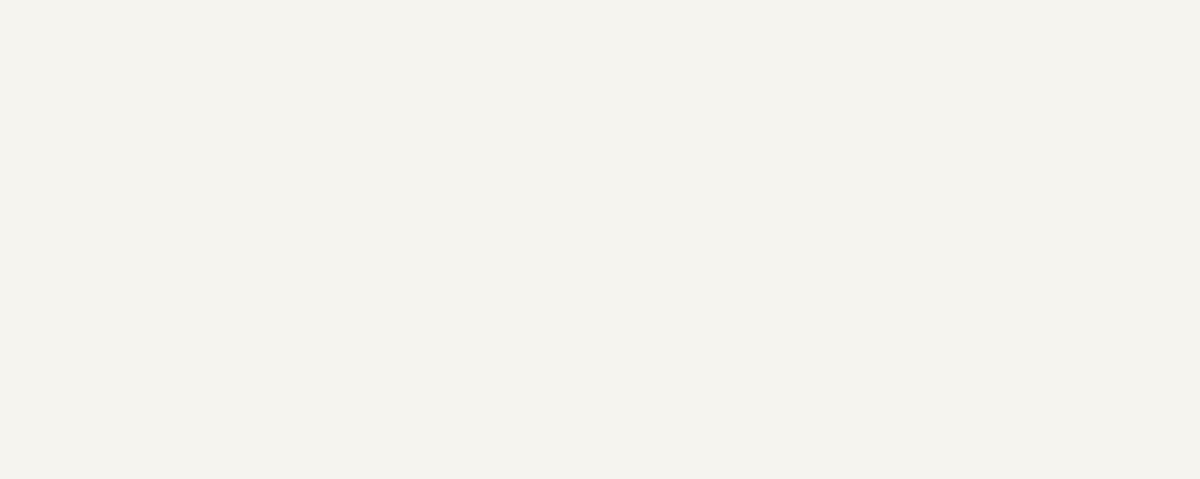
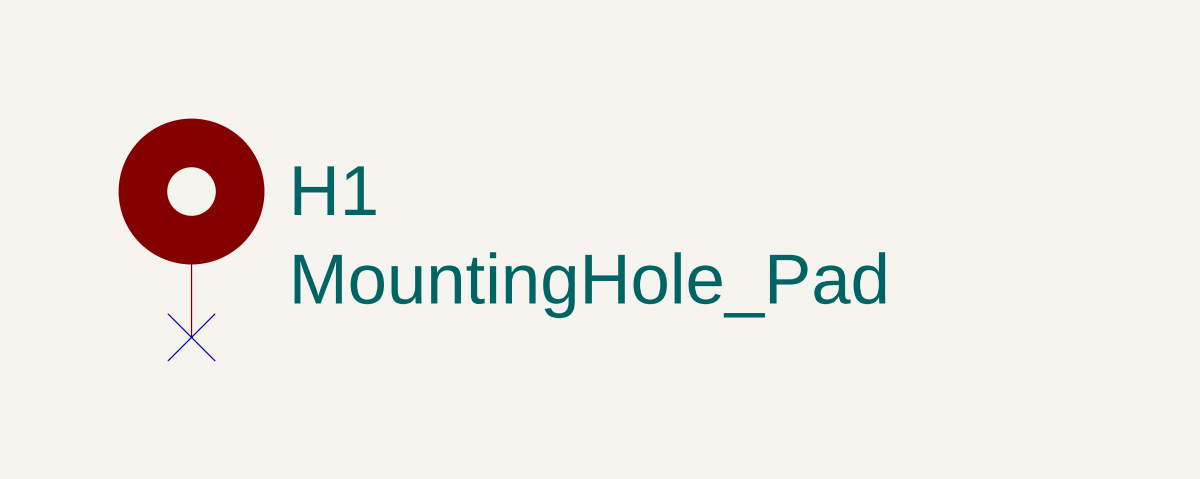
H1: none -> MountingHole_Pad (191, 228)
no-connect mark: none -> (191, 337)

